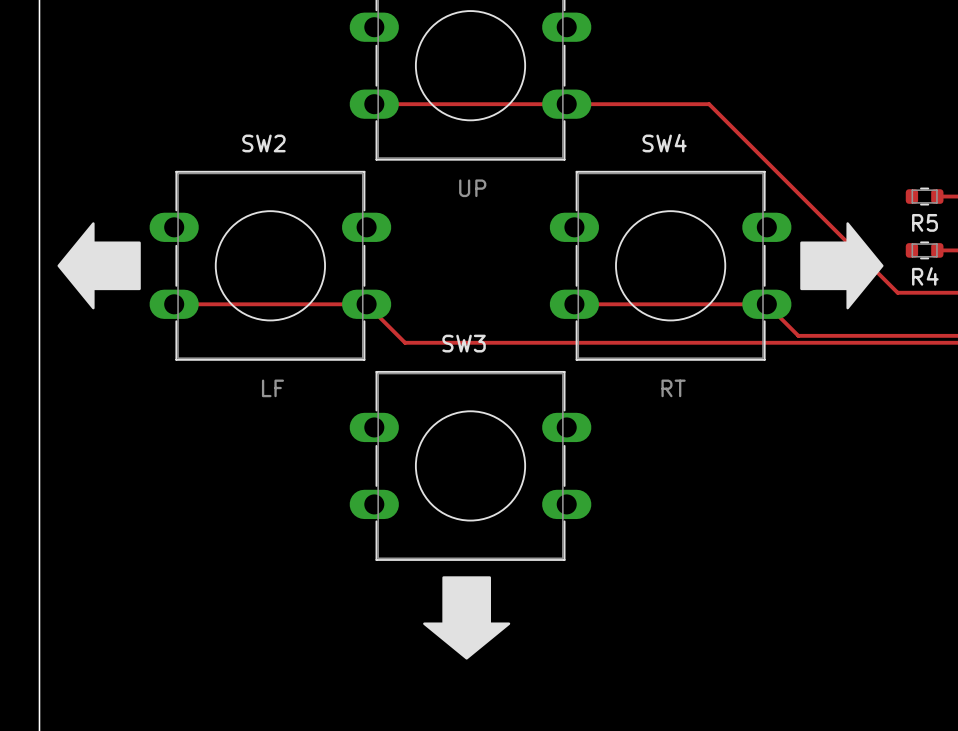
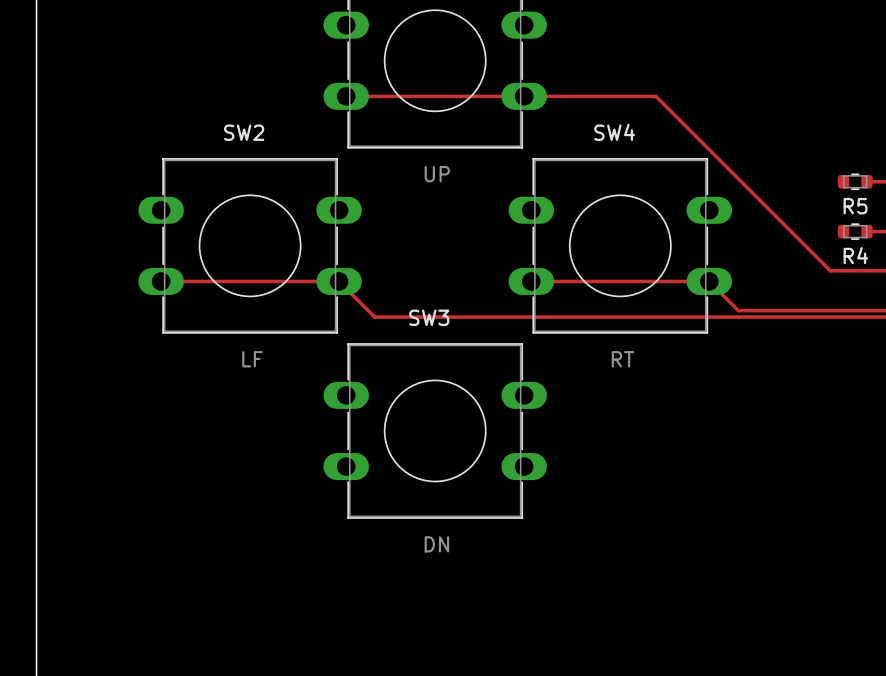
drawing: [57, 222, 141, 310] -> none
drawing: [800, 222, 884, 310] -> none
drawing: [423, 576, 511, 660] -> none

